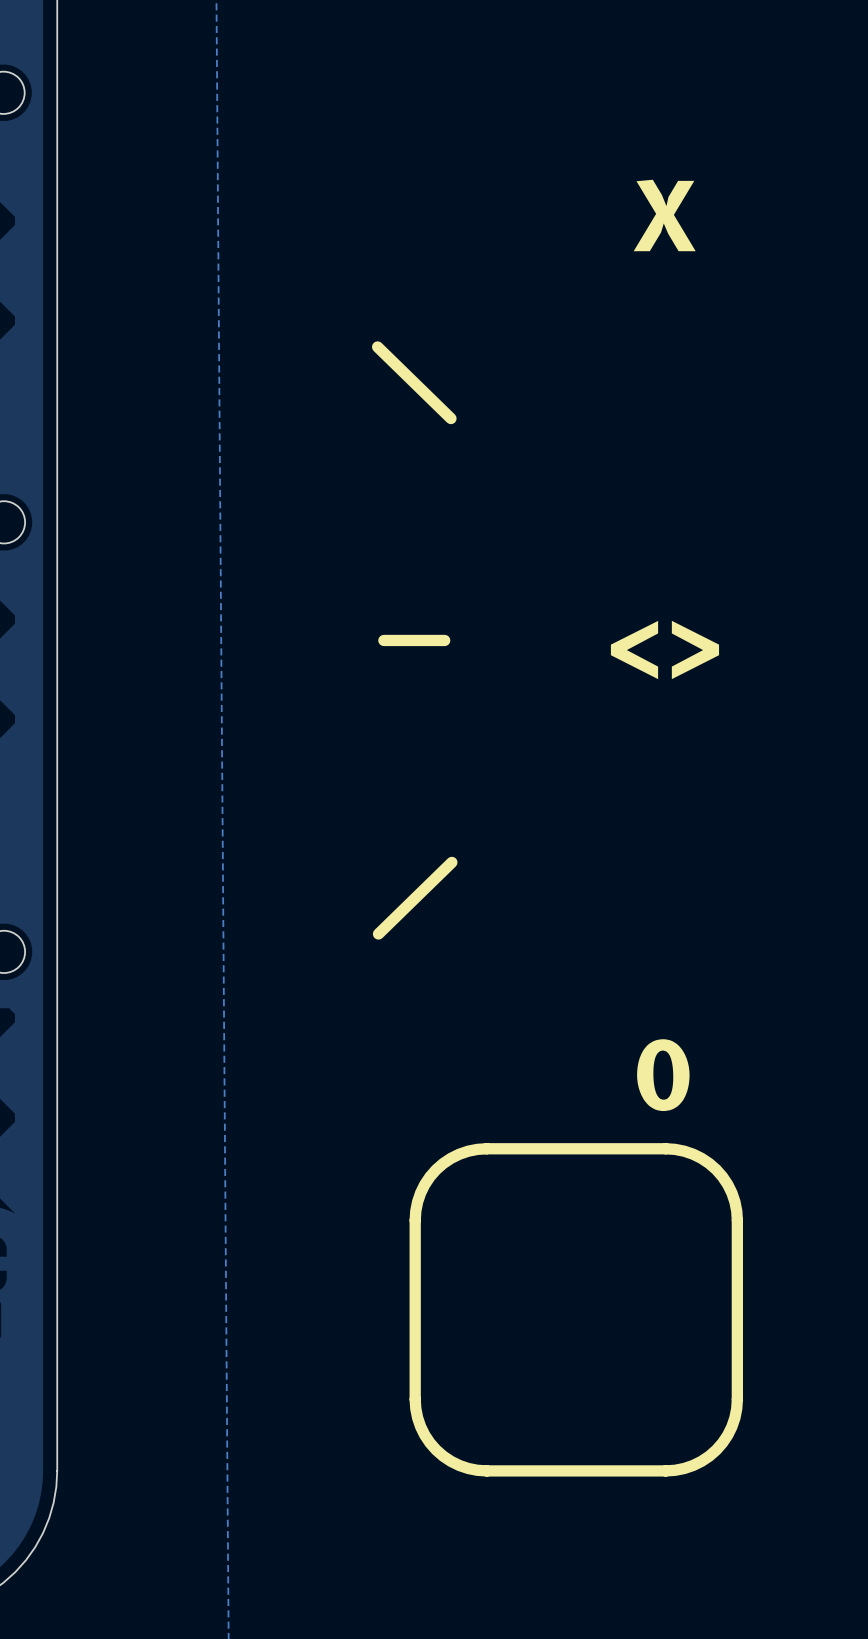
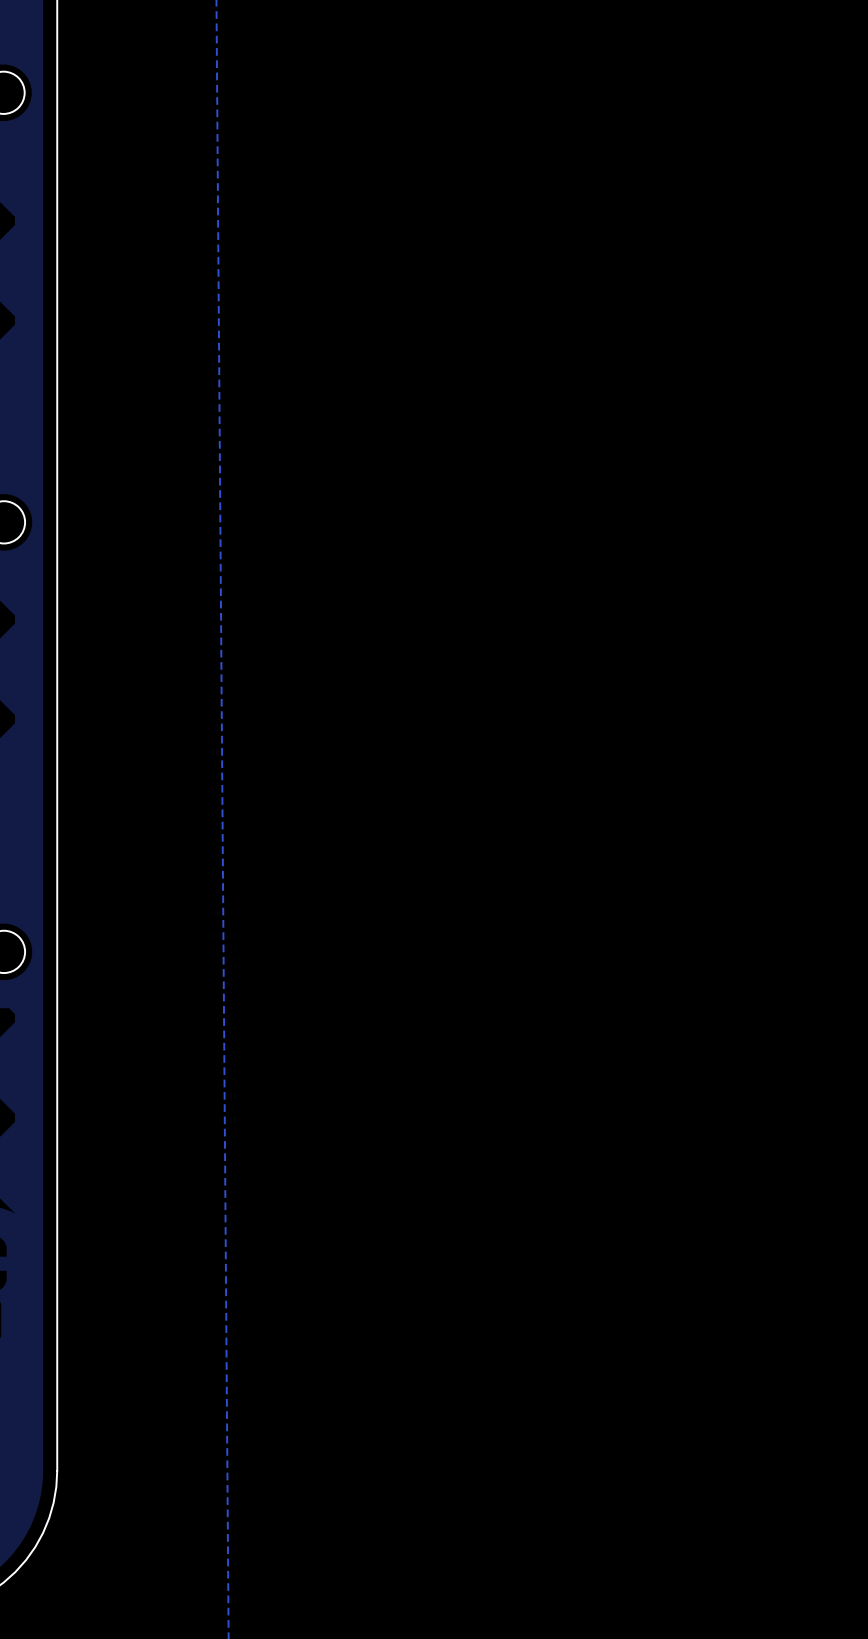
text: X (664, 215) -> none
line: (377, 346) (450, 418) -> none
line: (383, 640) (444, 640) -> none
text: <> (664, 649) -> none
line: (451, 862) (378, 933) -> none
text: 0 (663, 1075) -> none
line: (486, 1148) (675, 1149) (701, 1158) (722, 1176) (731, 1192) (736, 1211) (737, 1399) (731, 1426) (722, 1442) (709, 1456) (693, 1465) (675, 1470) (486, 1470) (468, 1468) (450, 1461) (429, 1442) (420, 1426) (415, 1399) (415, 1211) (424, 1184) (443, 1163) (468, 1151) (486, 1148) -> none

